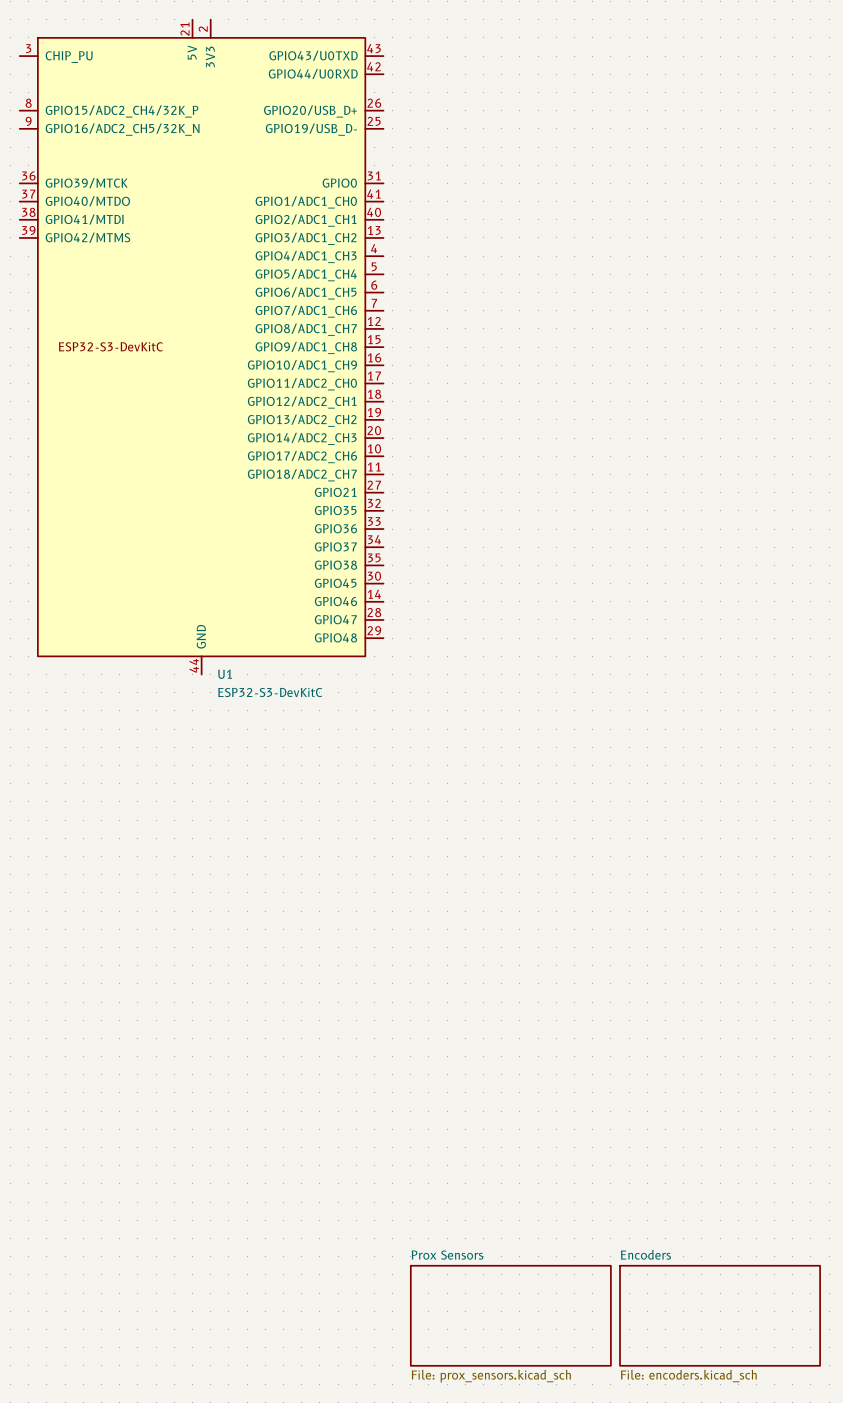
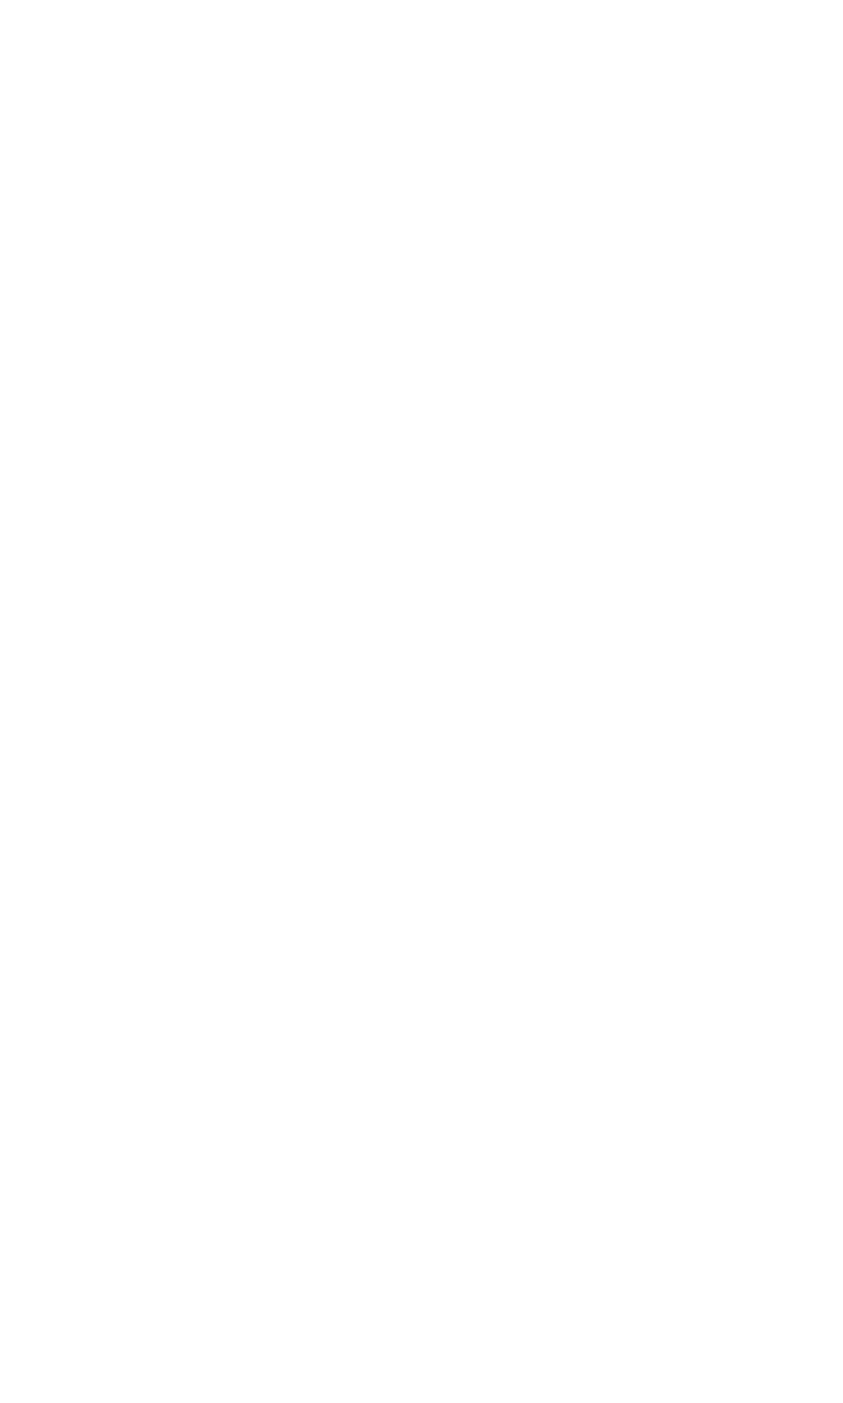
U1: ESP32-S3-DevKitC (201, 347) -> none
sheet Prox Sensors: File: prox_sensors.kicad_sch (510, 1315) -> none
sheet Encoders: File: encoders.kicad_sch (720, 1315) -> none

